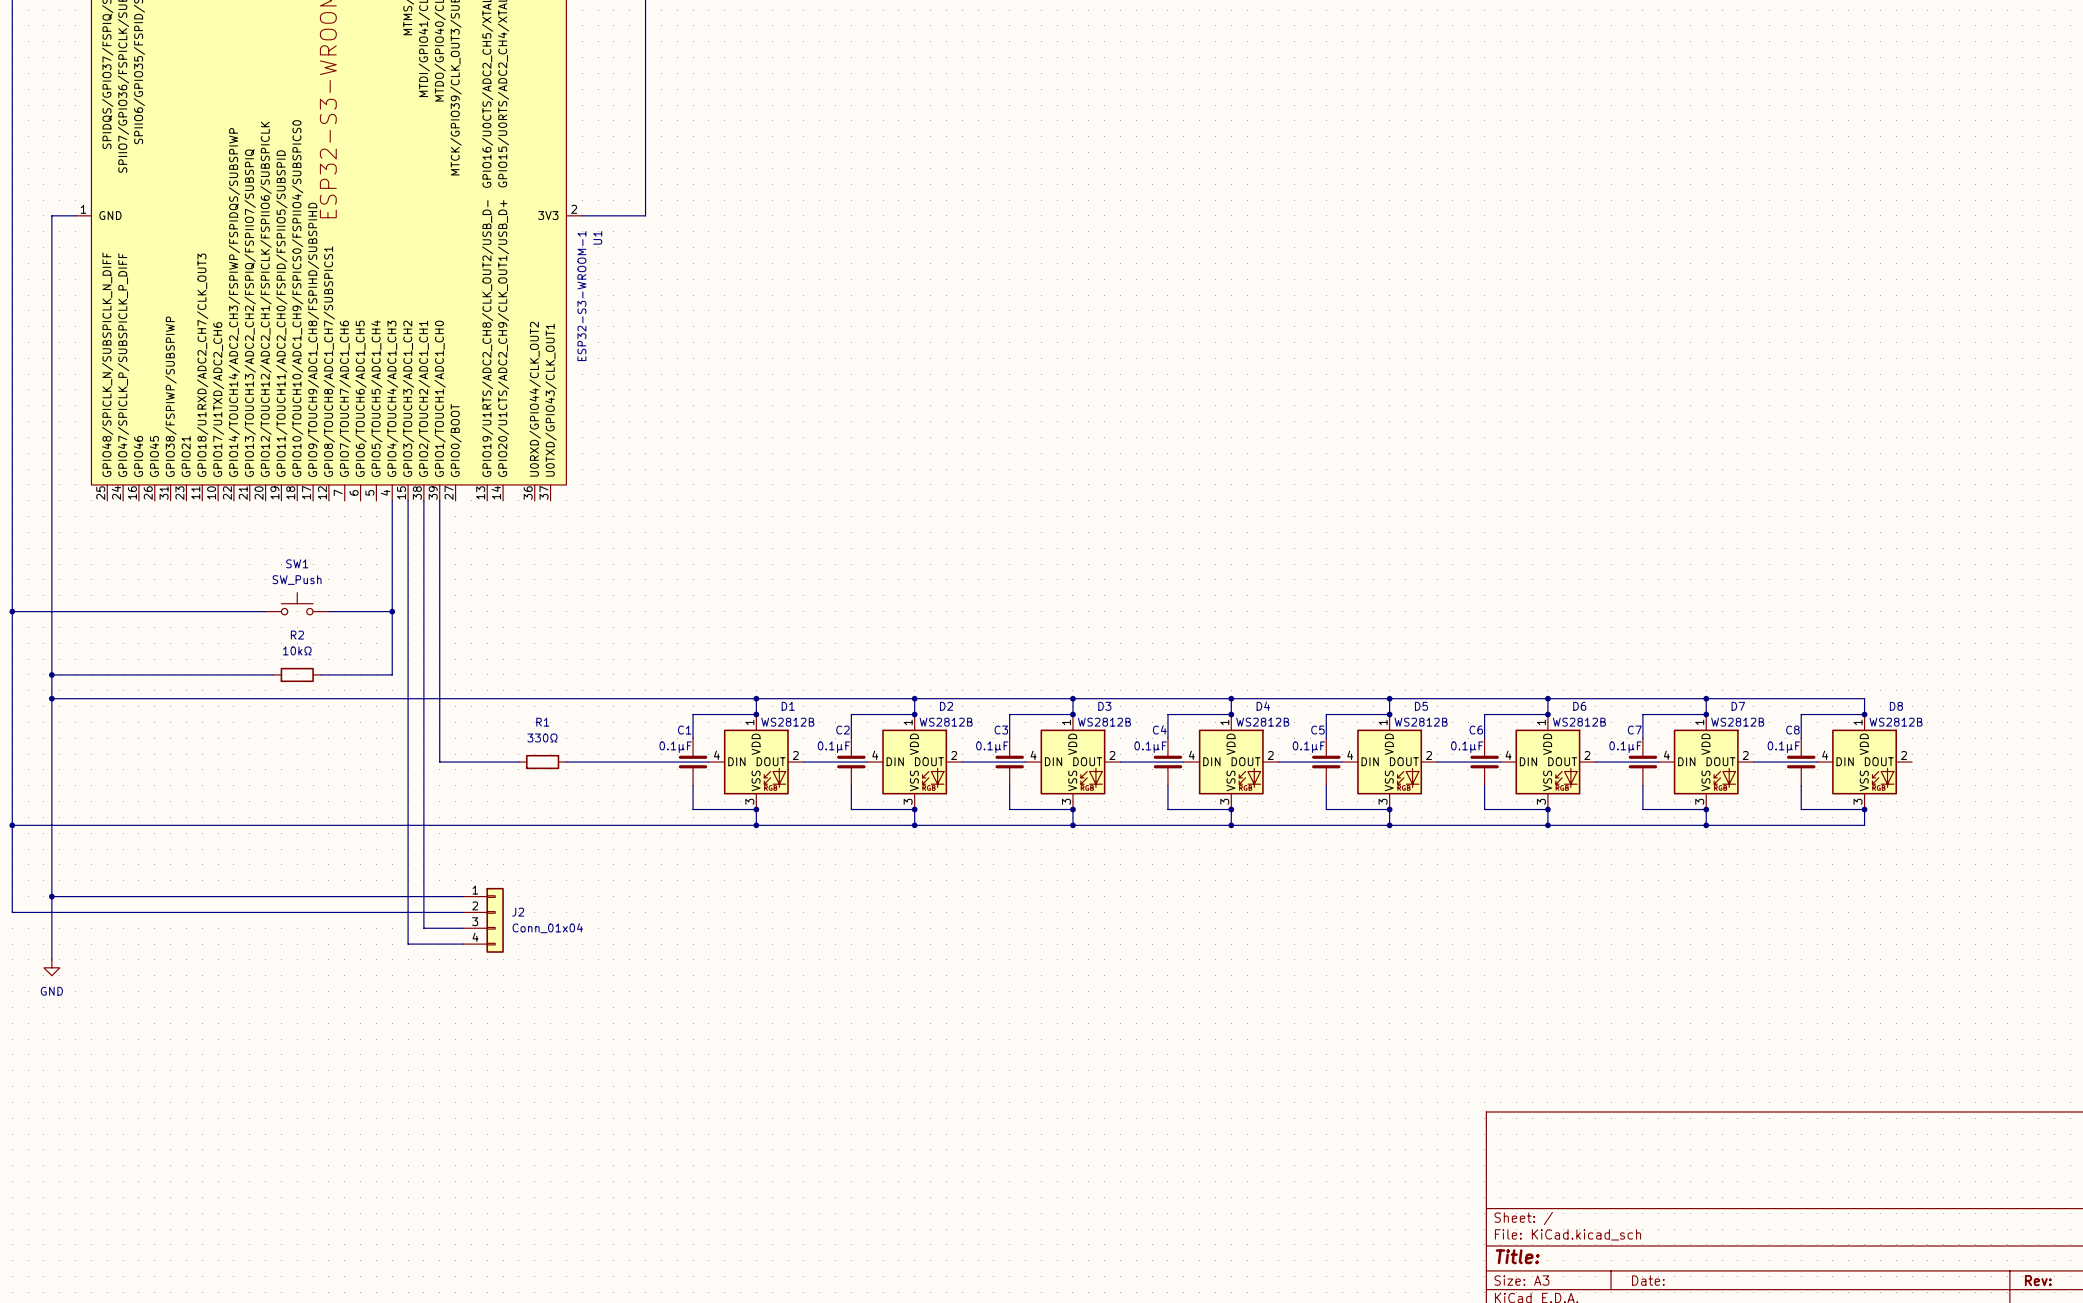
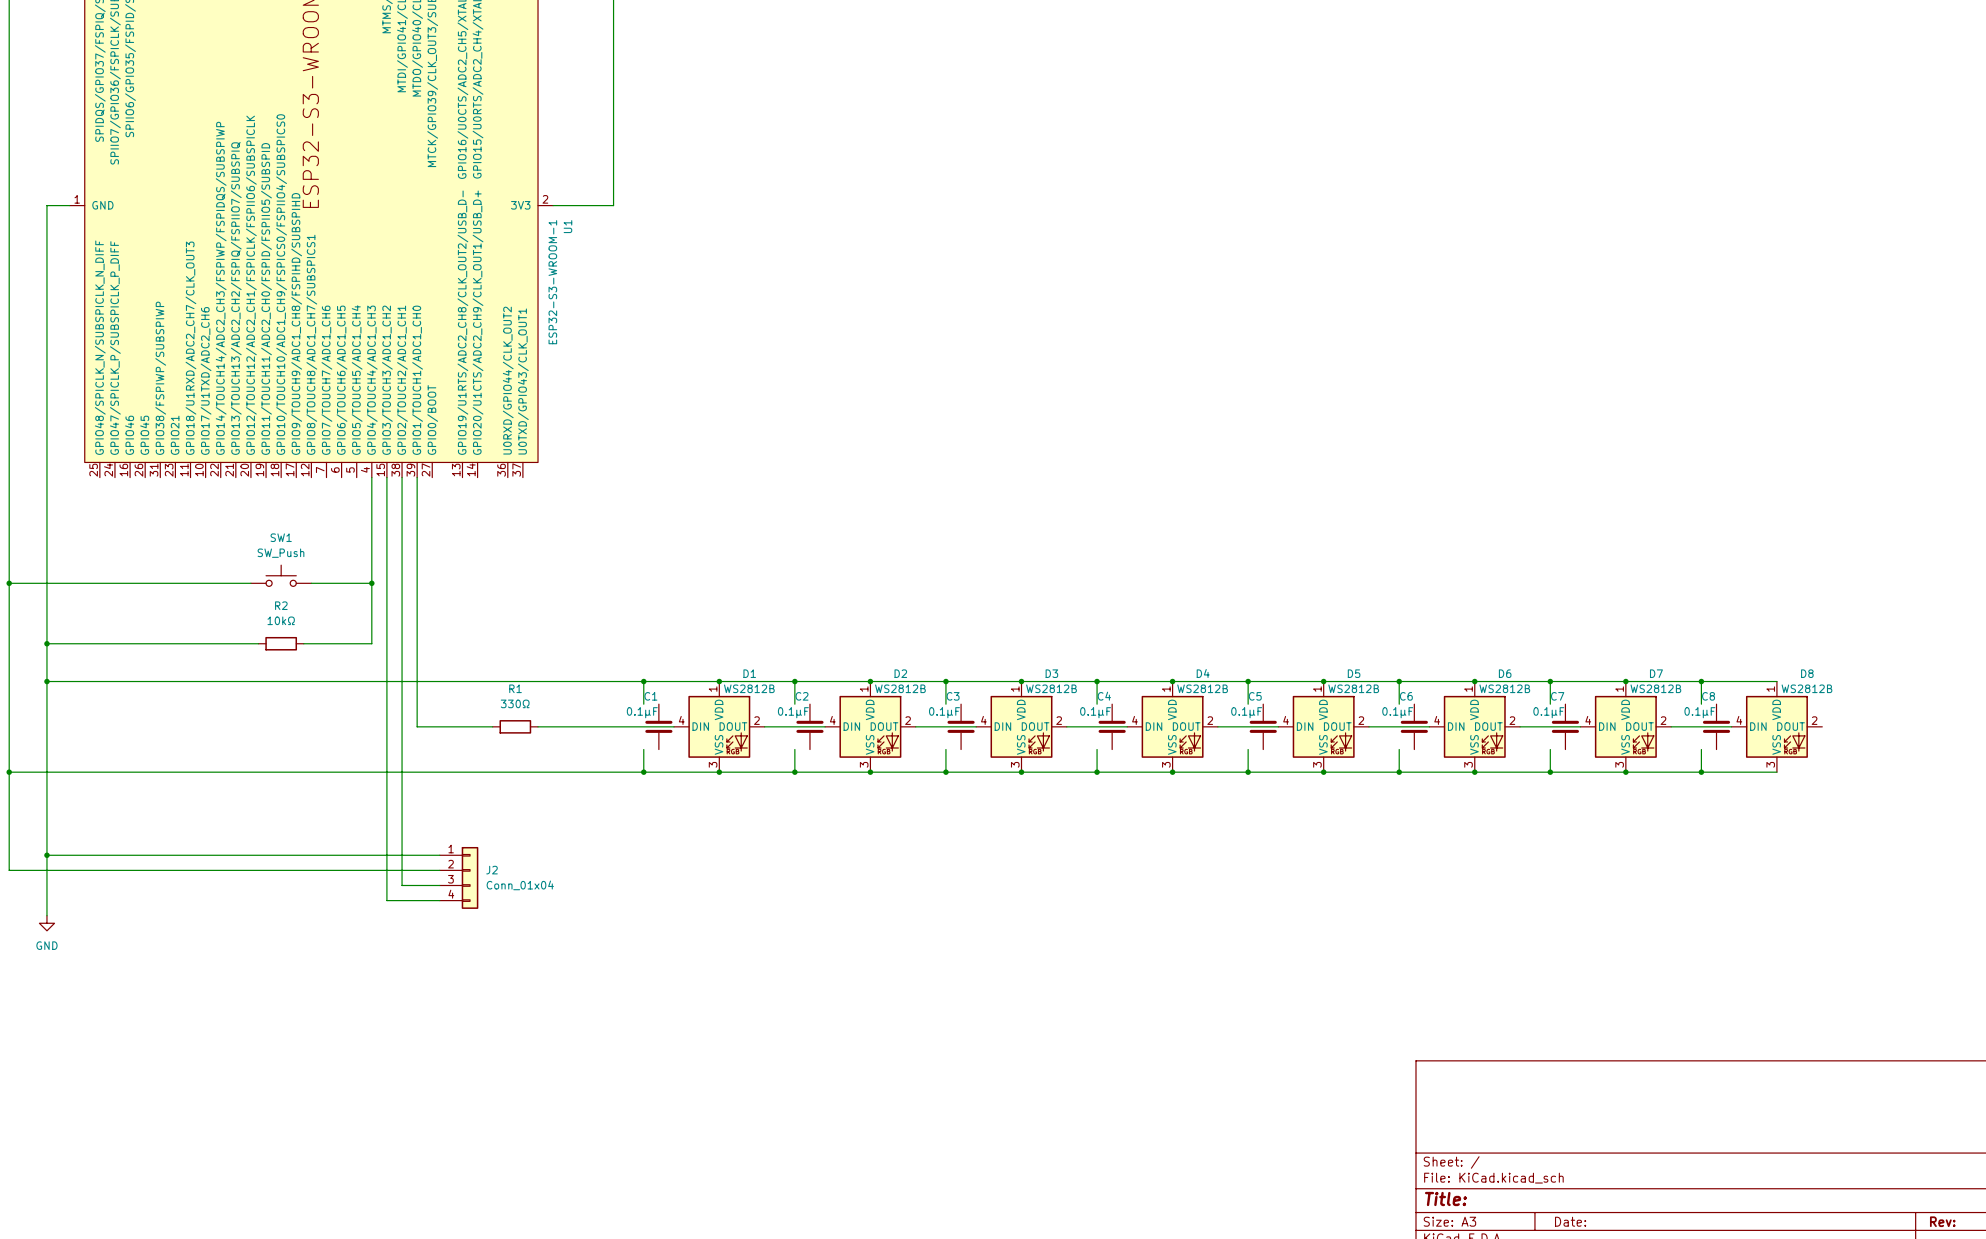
wire: (51, 698) (1864, 698) (1864, 714) -> none
junction position: (51, 698) -> (46, 681)
wire: (756, 698) (756, 714) -> (809, 681) (719, 681)
junction: (756, 698) -> none
wire: (914, 698) (914, 714) -> (961, 681) (870, 681)
junction: (914, 698) -> none
wire: (1072, 698) (1072, 714) -> (1112, 681) (1021, 681)
junction: (1072, 698) -> none
wire: (1231, 698) (1231, 714) -> (1263, 681) (1172, 681)
junction: (1231, 698) -> none
wire: (1389, 698) (1389, 714) -> (1414, 681) (1323, 681)
junction: (1389, 698) -> none
wire: (1547, 698) (1547, 714) -> (1565, 681) (1474, 681)
junction: (1547, 698) -> none
wire: (1706, 698) (1706, 714) -> (1716, 681) (1625, 681)
junction: (1706, 698) -> none
wire: none -> (643, 681) (643, 704)
junction: none -> (643, 681)
wire: (693, 714) (693, 738) -> (658, 681) (46, 681)
junction: none -> (794, 681)
wire: (851, 714) (851, 738) -> (794, 681) (794, 704)
junction: none -> (945, 681)
wire: (1009, 714) (1009, 738) -> (945, 681) (945, 704)
junction: none -> (1097, 681)
wire: (1167, 714) (1167, 738) -> (1097, 681) (1097, 704)
junction: none -> (1248, 681)
wire: (1326, 714) (1326, 738) -> (1248, 681) (1248, 704)
junction: none -> (1399, 681)
wire: (1484, 714) (1484, 738) -> (1399, 681) (1399, 704)
junction: none -> (1550, 681)
wire: (1642, 714) (1642, 738) -> (1550, 681) (1550, 704)
junction: none -> (1701, 681)
wire: (1801, 714) (1801, 738) -> (1701, 681) (1701, 704)
junction: (1864, 714) -> none
wire: none -> (643, 749) (643, 772)
wire: (693, 785) (693, 809) -> (9, 772) (658, 772)
wire: (851, 785) (851, 809) -> (794, 749) (794, 772)
wire: (1009, 785) (1009, 809) -> (945, 749) (945, 772)
wire: (1167, 785) (1167, 809) -> (1097, 749) (1097, 772)
wire: (1326, 785) (1326, 809) -> (1248, 749) (1248, 772)
wire: (1484, 785) (1484, 809) -> (1399, 749) (1399, 772)
wire: (1642, 785) (1642, 809) -> (1550, 749) (1550, 772)
wire: (1801, 785) (1801, 809) -> (1701, 749) (1701, 772)
junction: none -> (643, 772)
wire: (756, 809) (756, 825) -> (719, 772) (809, 772)
junction: none -> (794, 772)
wire: (914, 809) (914, 825) -> (870, 772) (961, 772)
junction: none -> (945, 772)
wire: (1072, 809) (1072, 825) -> (1021, 772) (1112, 772)
junction: none -> (1097, 772)
wire: (1231, 809) (1231, 825) -> (1172, 772) (1263, 772)
junction: none -> (1248, 772)
wire: (1389, 809) (1389, 825) -> (1323, 772) (1414, 772)
junction: none -> (1399, 772)
wire: (1547, 809) (1547, 825) -> (1474, 772) (1565, 772)
junction: none -> (1550, 772)
wire: (1706, 809) (1706, 825) -> (1625, 772) (1716, 772)
junction: none -> (1701, 772)
wire: (1864, 809) (1864, 825) (12, 825) -> none
junction: (1864, 809) -> none
junction position: (12, 825) -> (9, 772)
junction: (756, 825) -> none
junction: (914, 825) -> none
junction: (1072, 825) -> none
junction: (1231, 825) -> none
junction: (1389, 825) -> none
junction: (1547, 825) -> none
junction: (1706, 825) -> none

